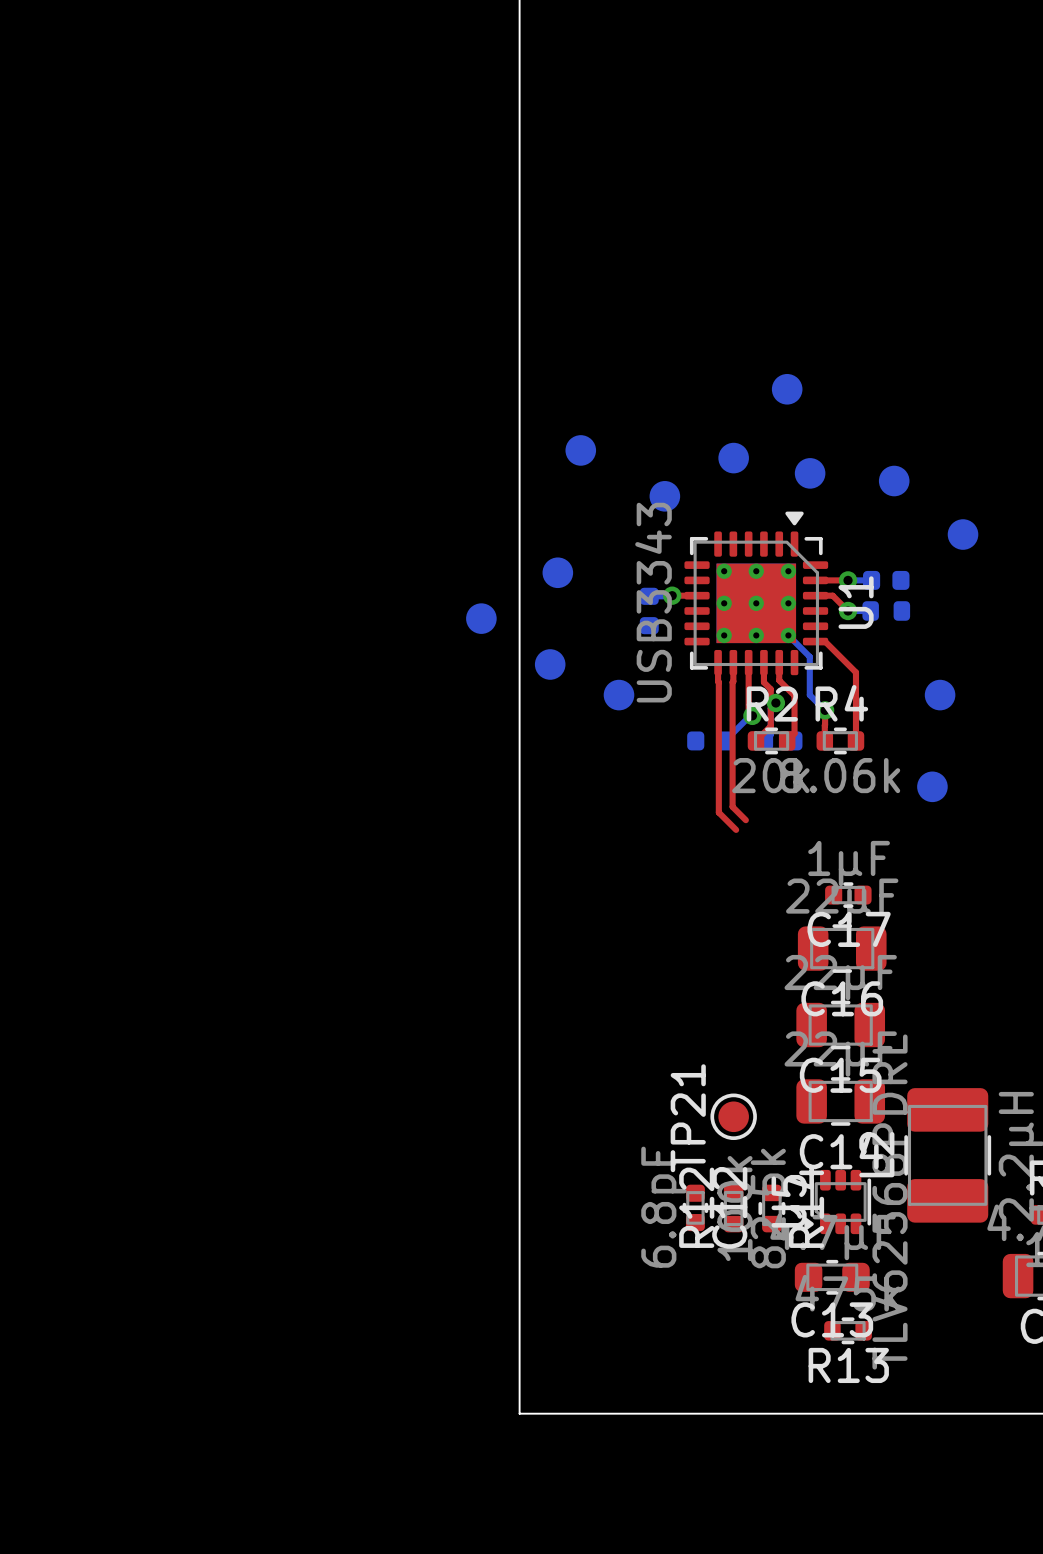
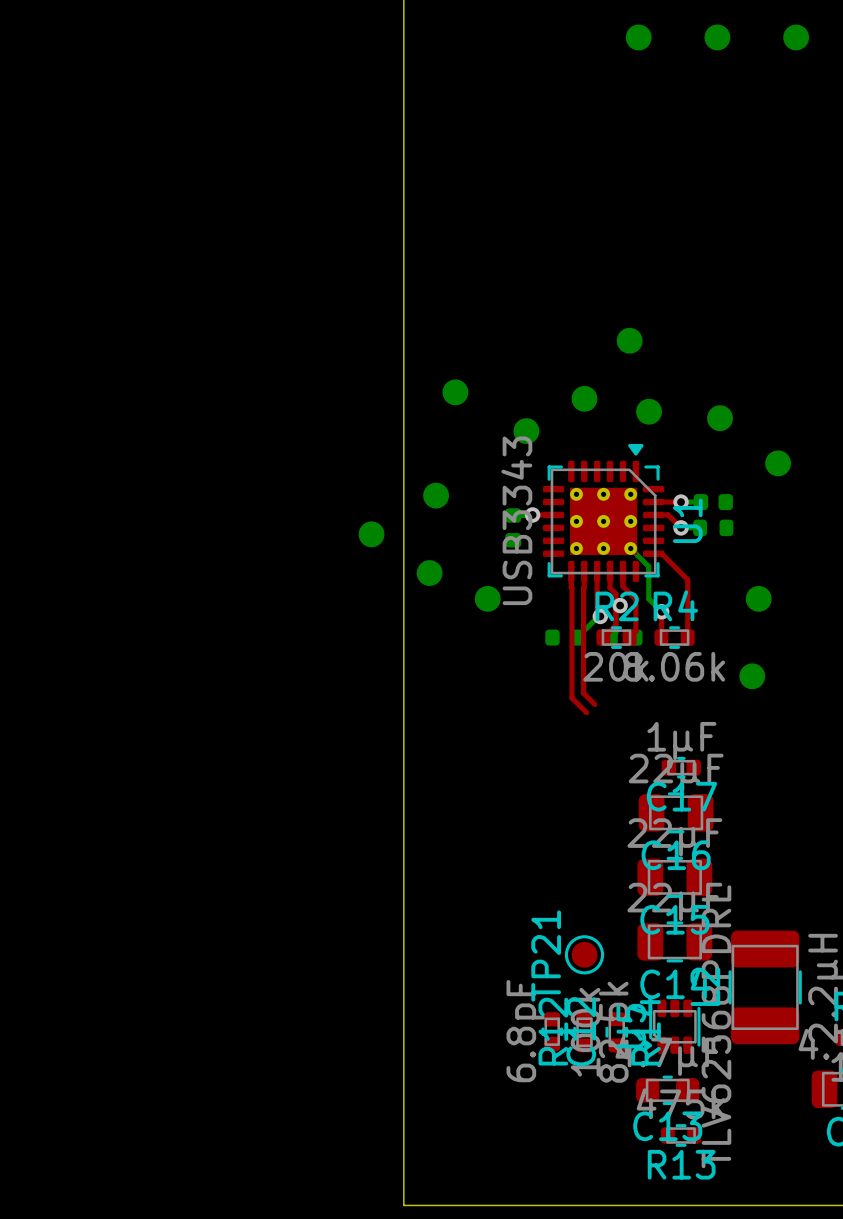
part: none -> (638, 37)
part: none -> (717, 37)
part: none -> (796, 37)

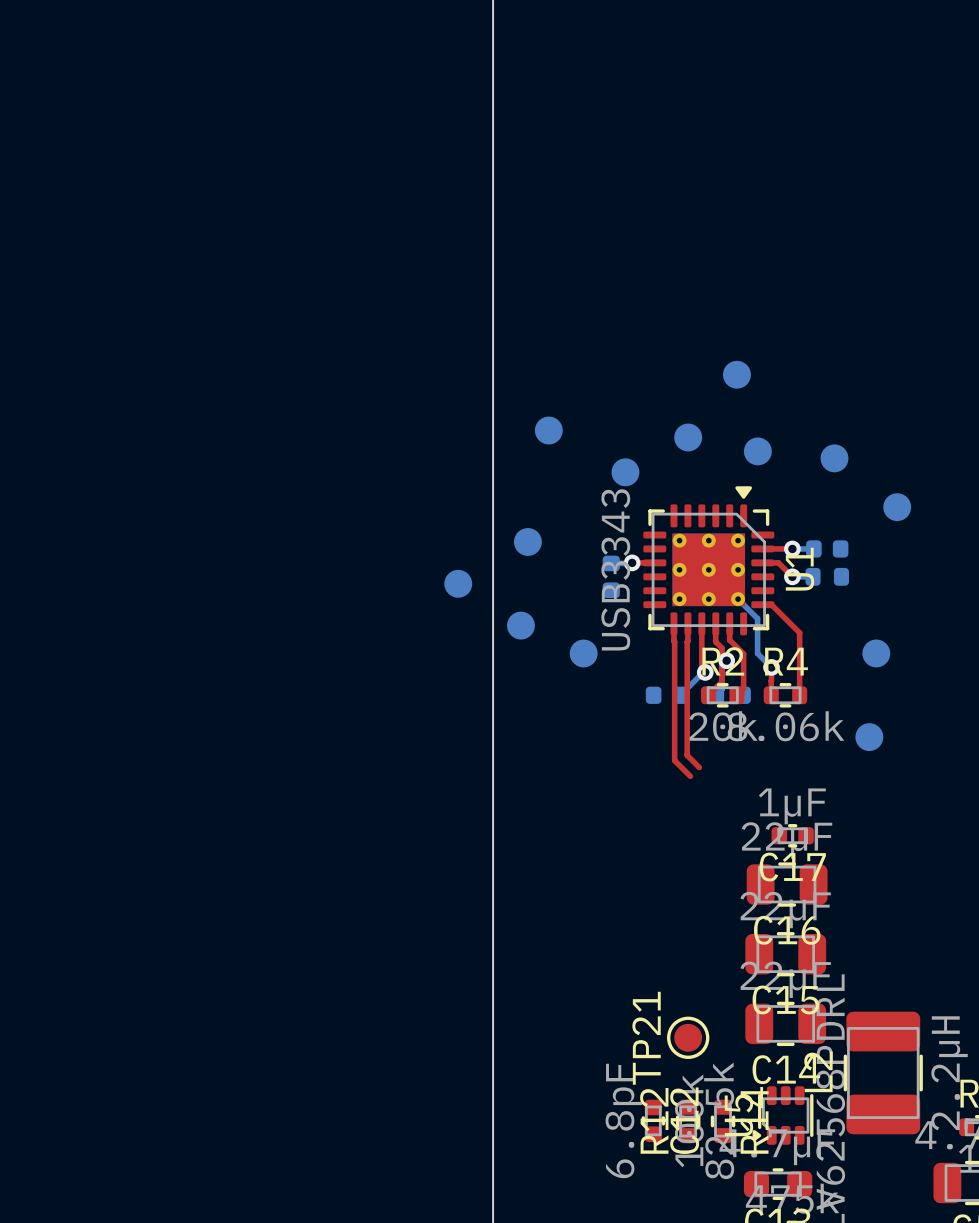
part: (638, 37) -> none
part: (717, 37) -> none
part: (796, 37) -> none

